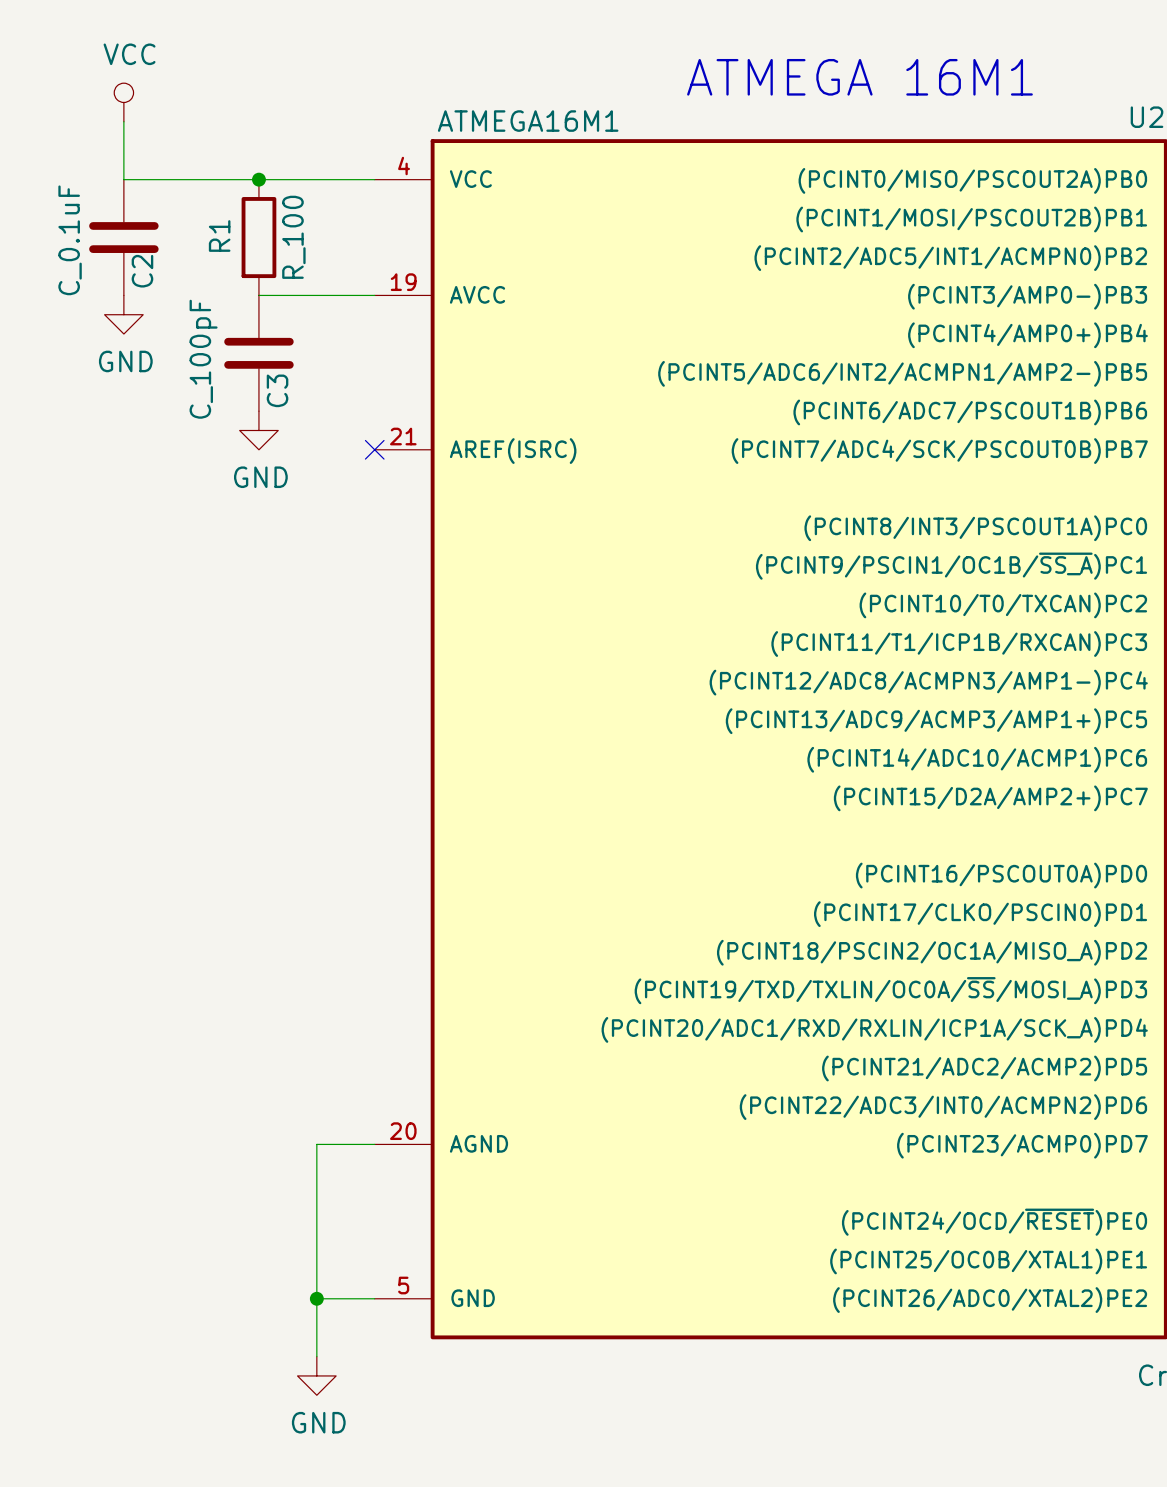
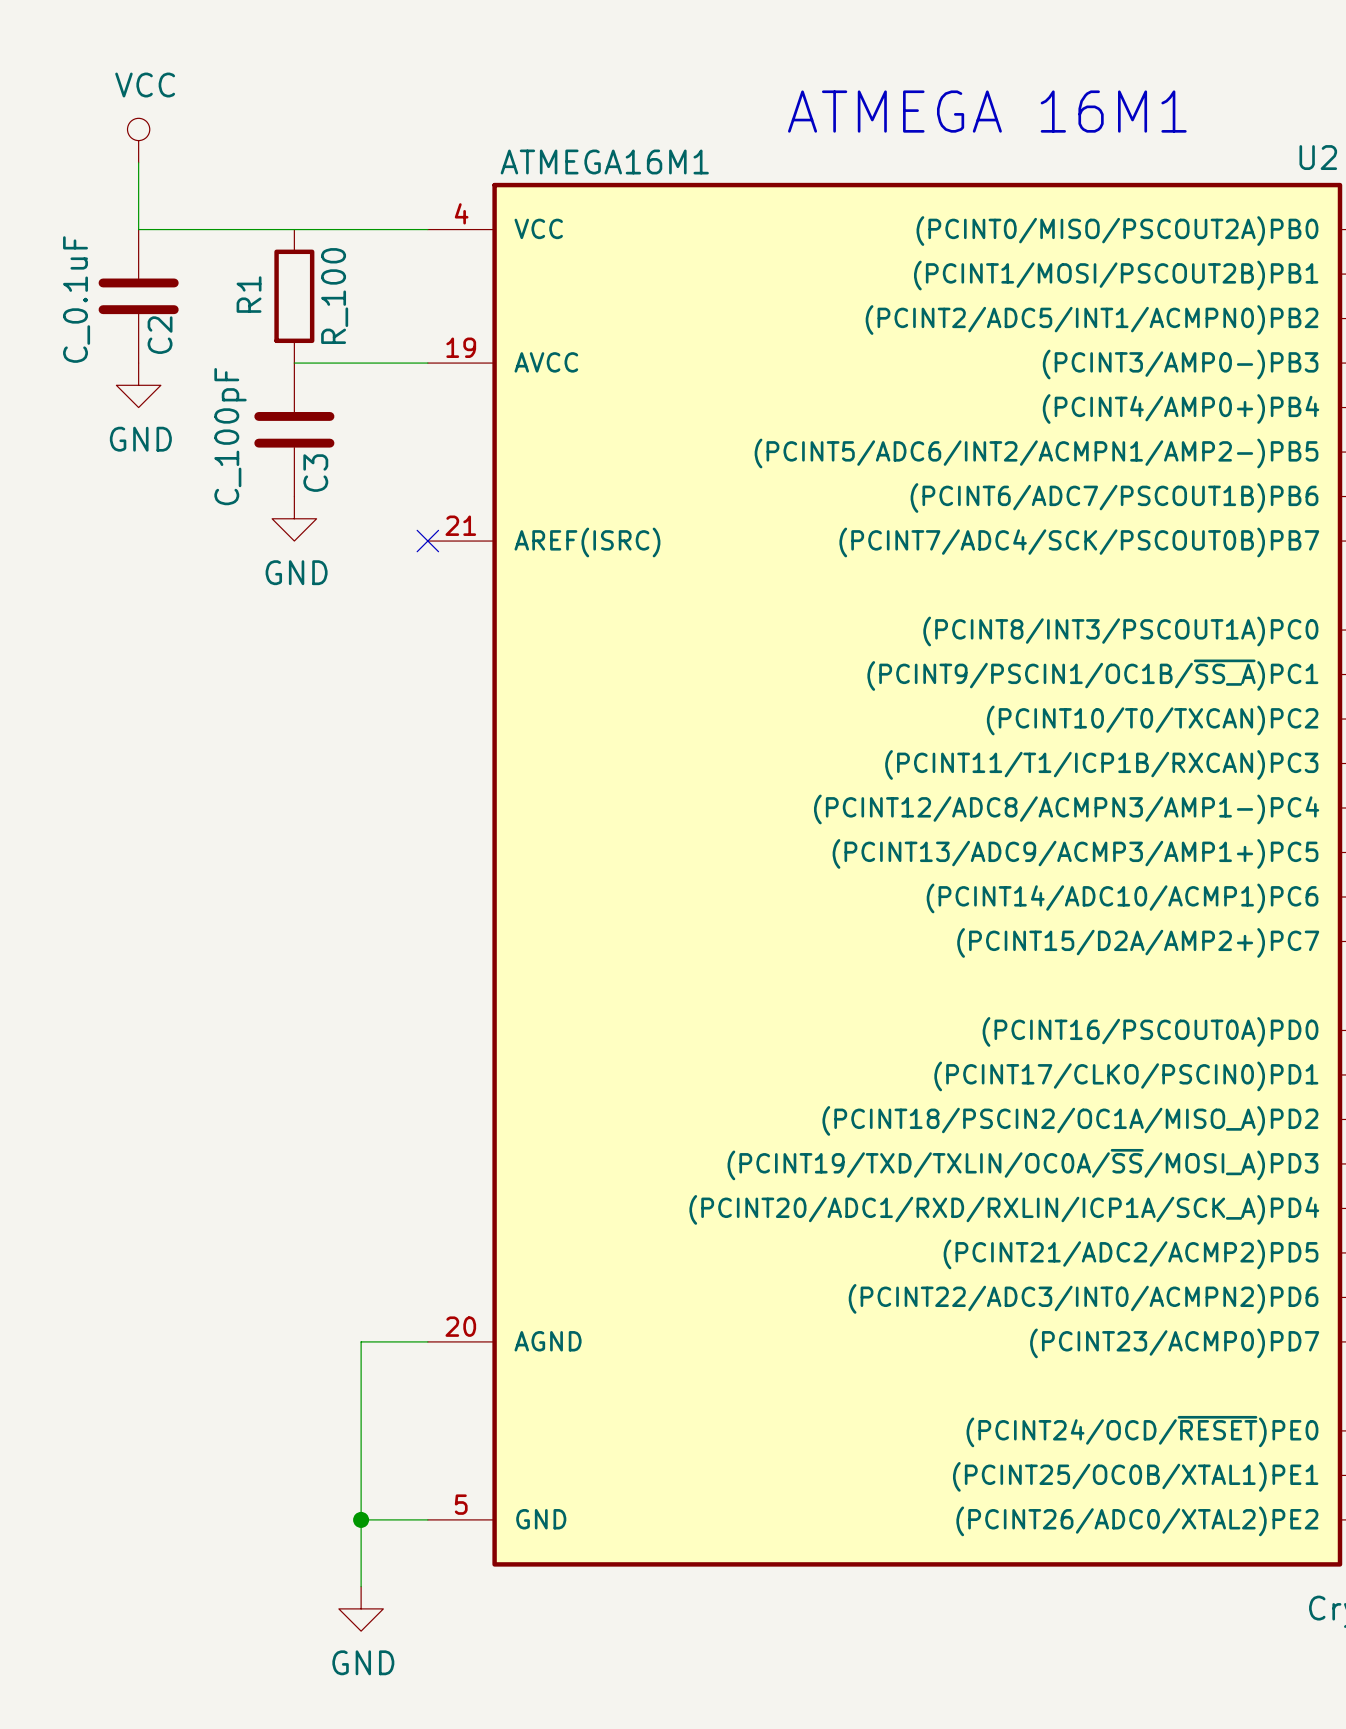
junction: (258, 179) -> none

